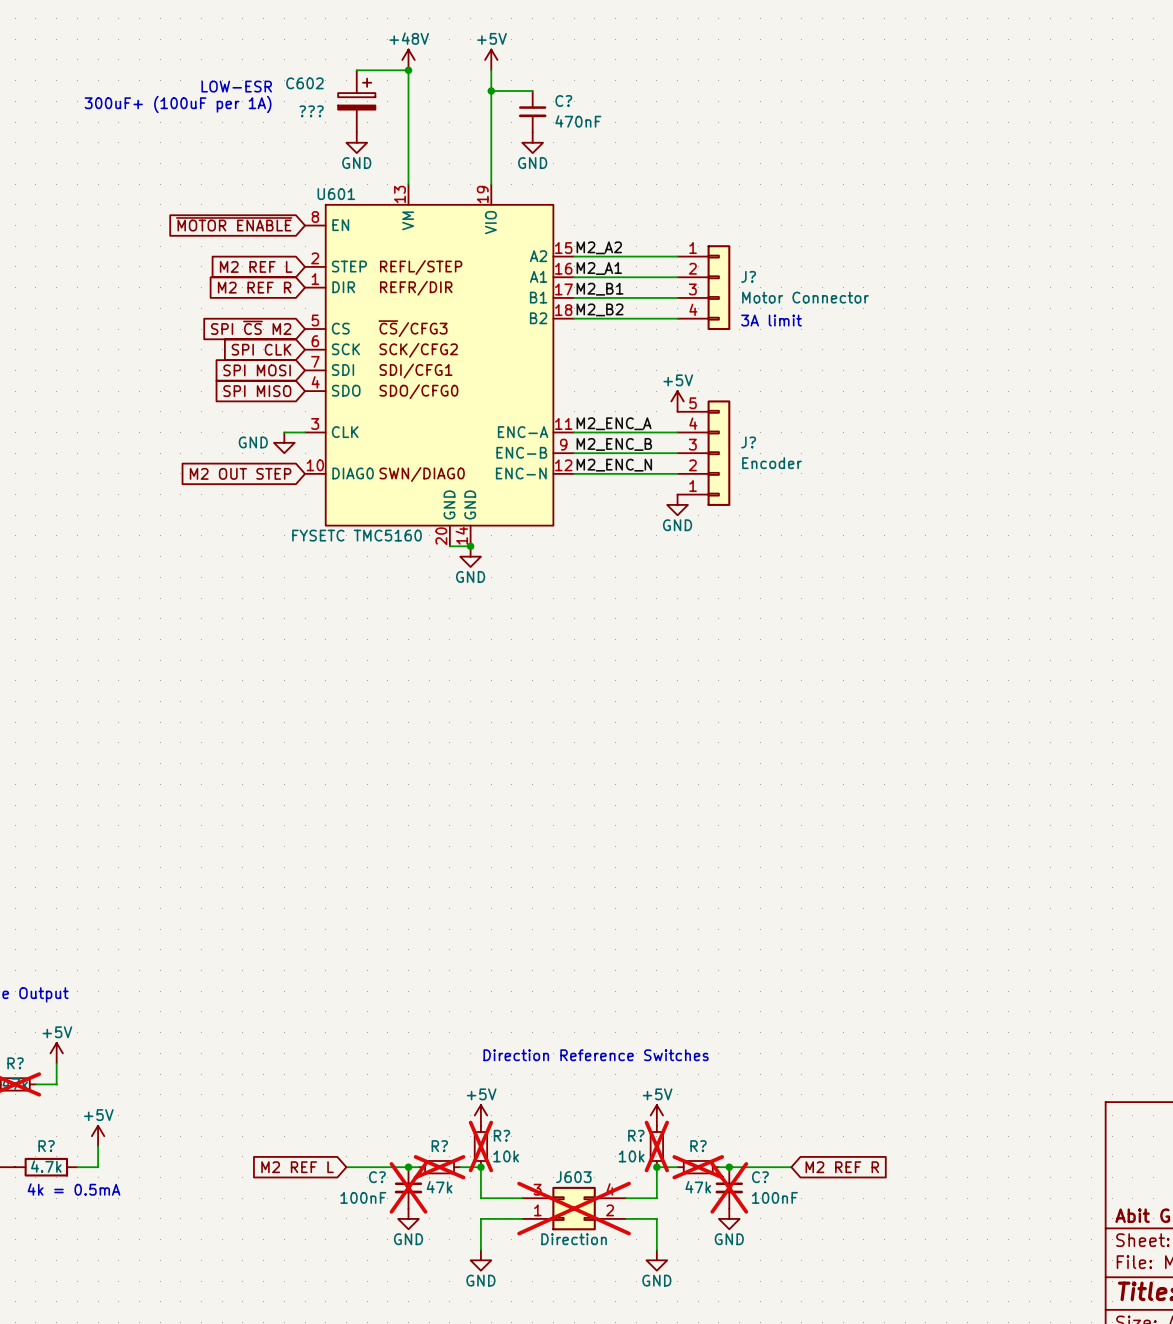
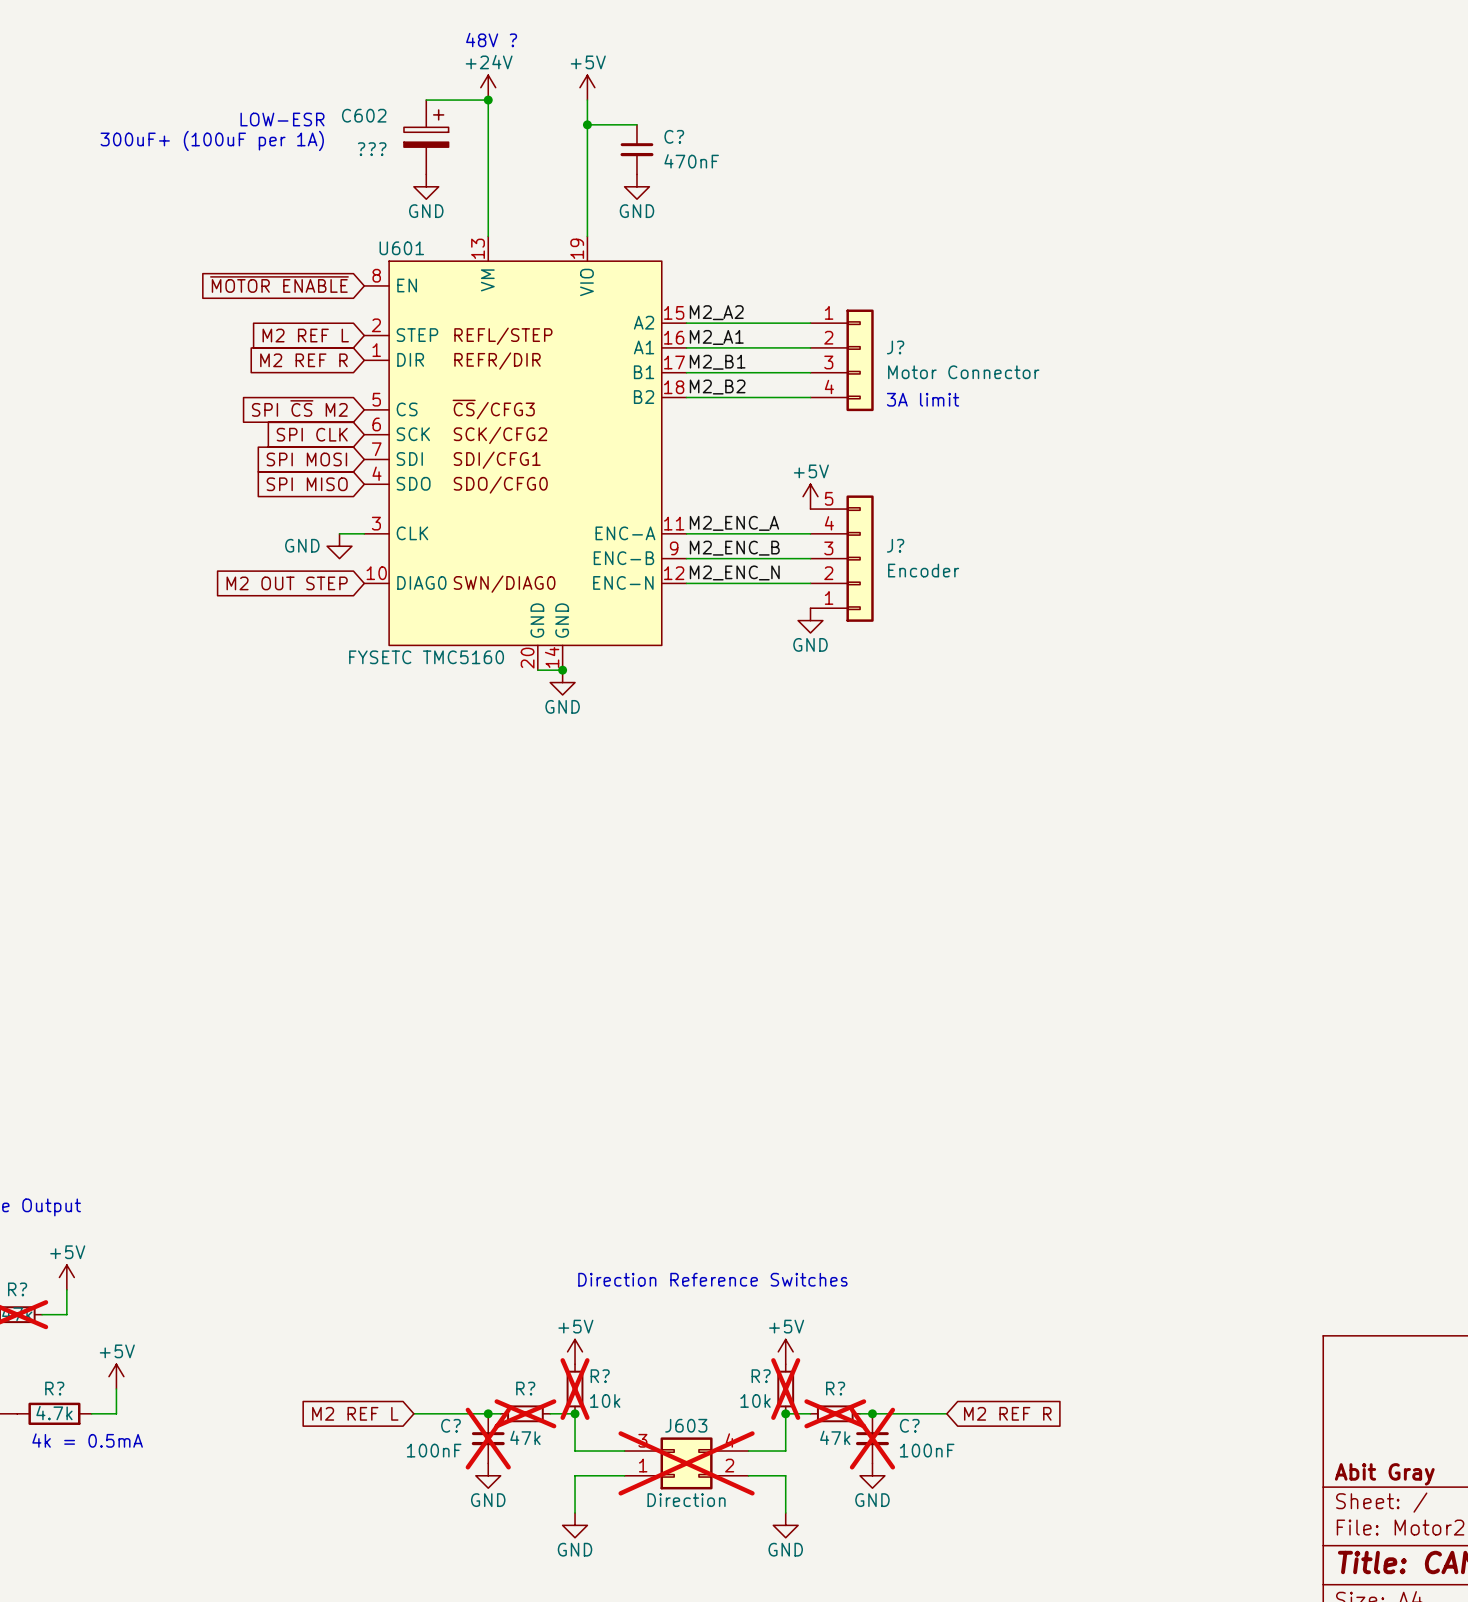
text: none -> 48V ? (491, 40)
power symbol: +48V (408, 59) -> +24V (488, 87)

